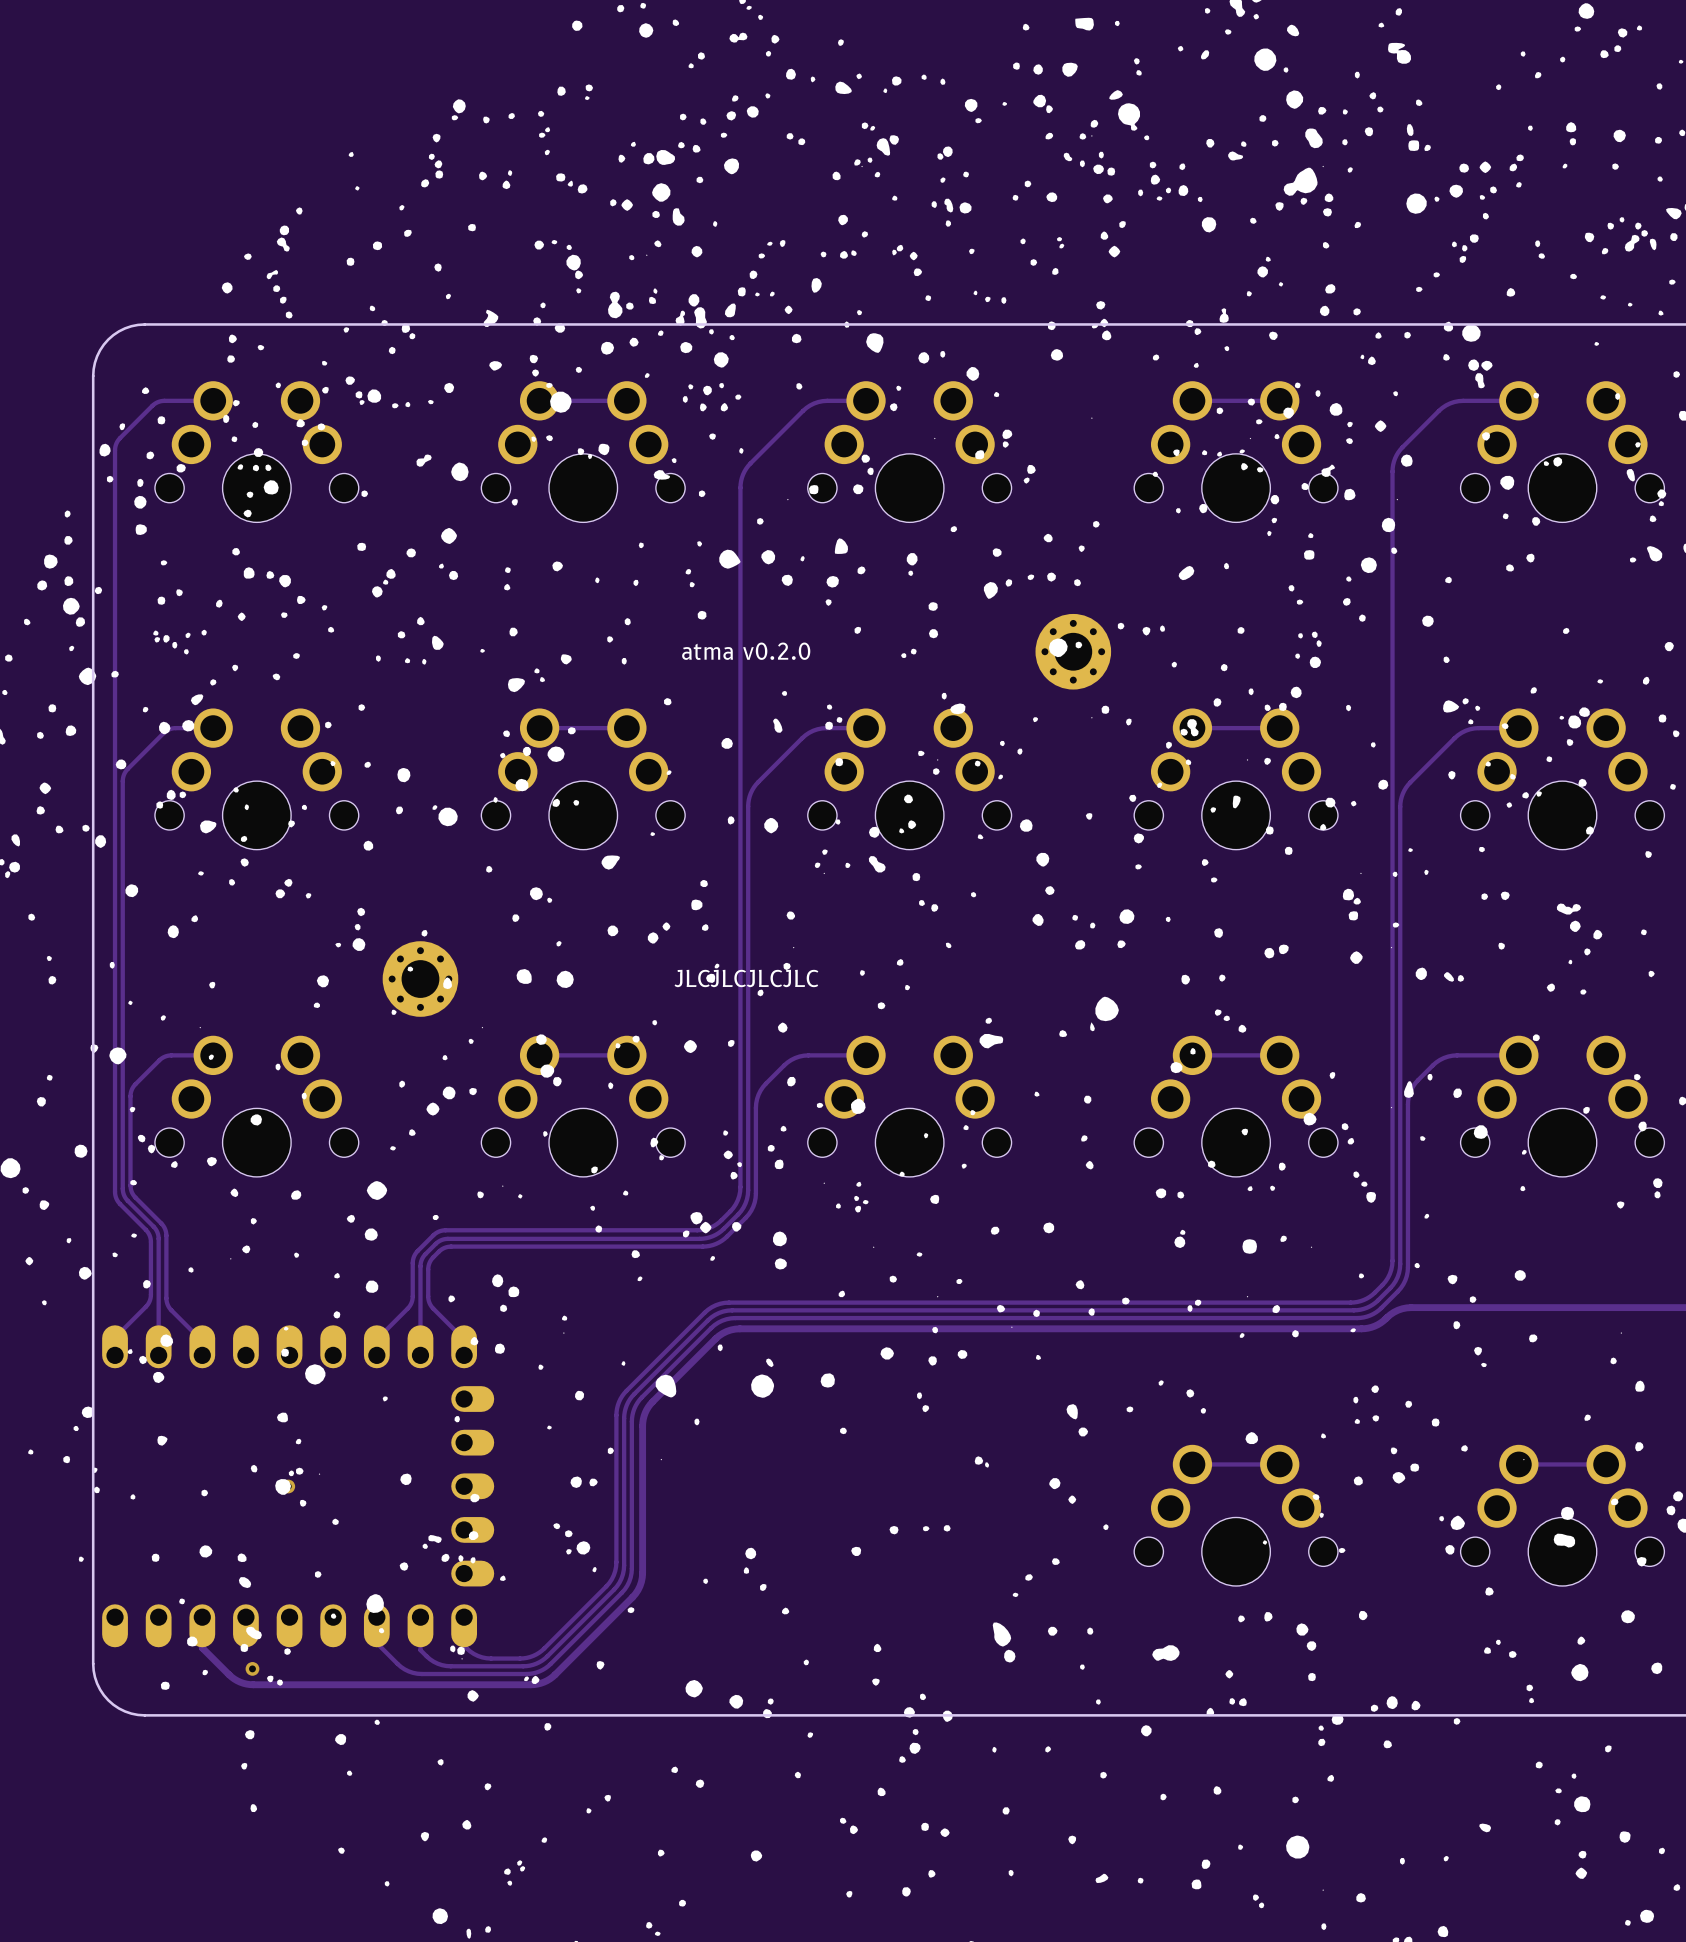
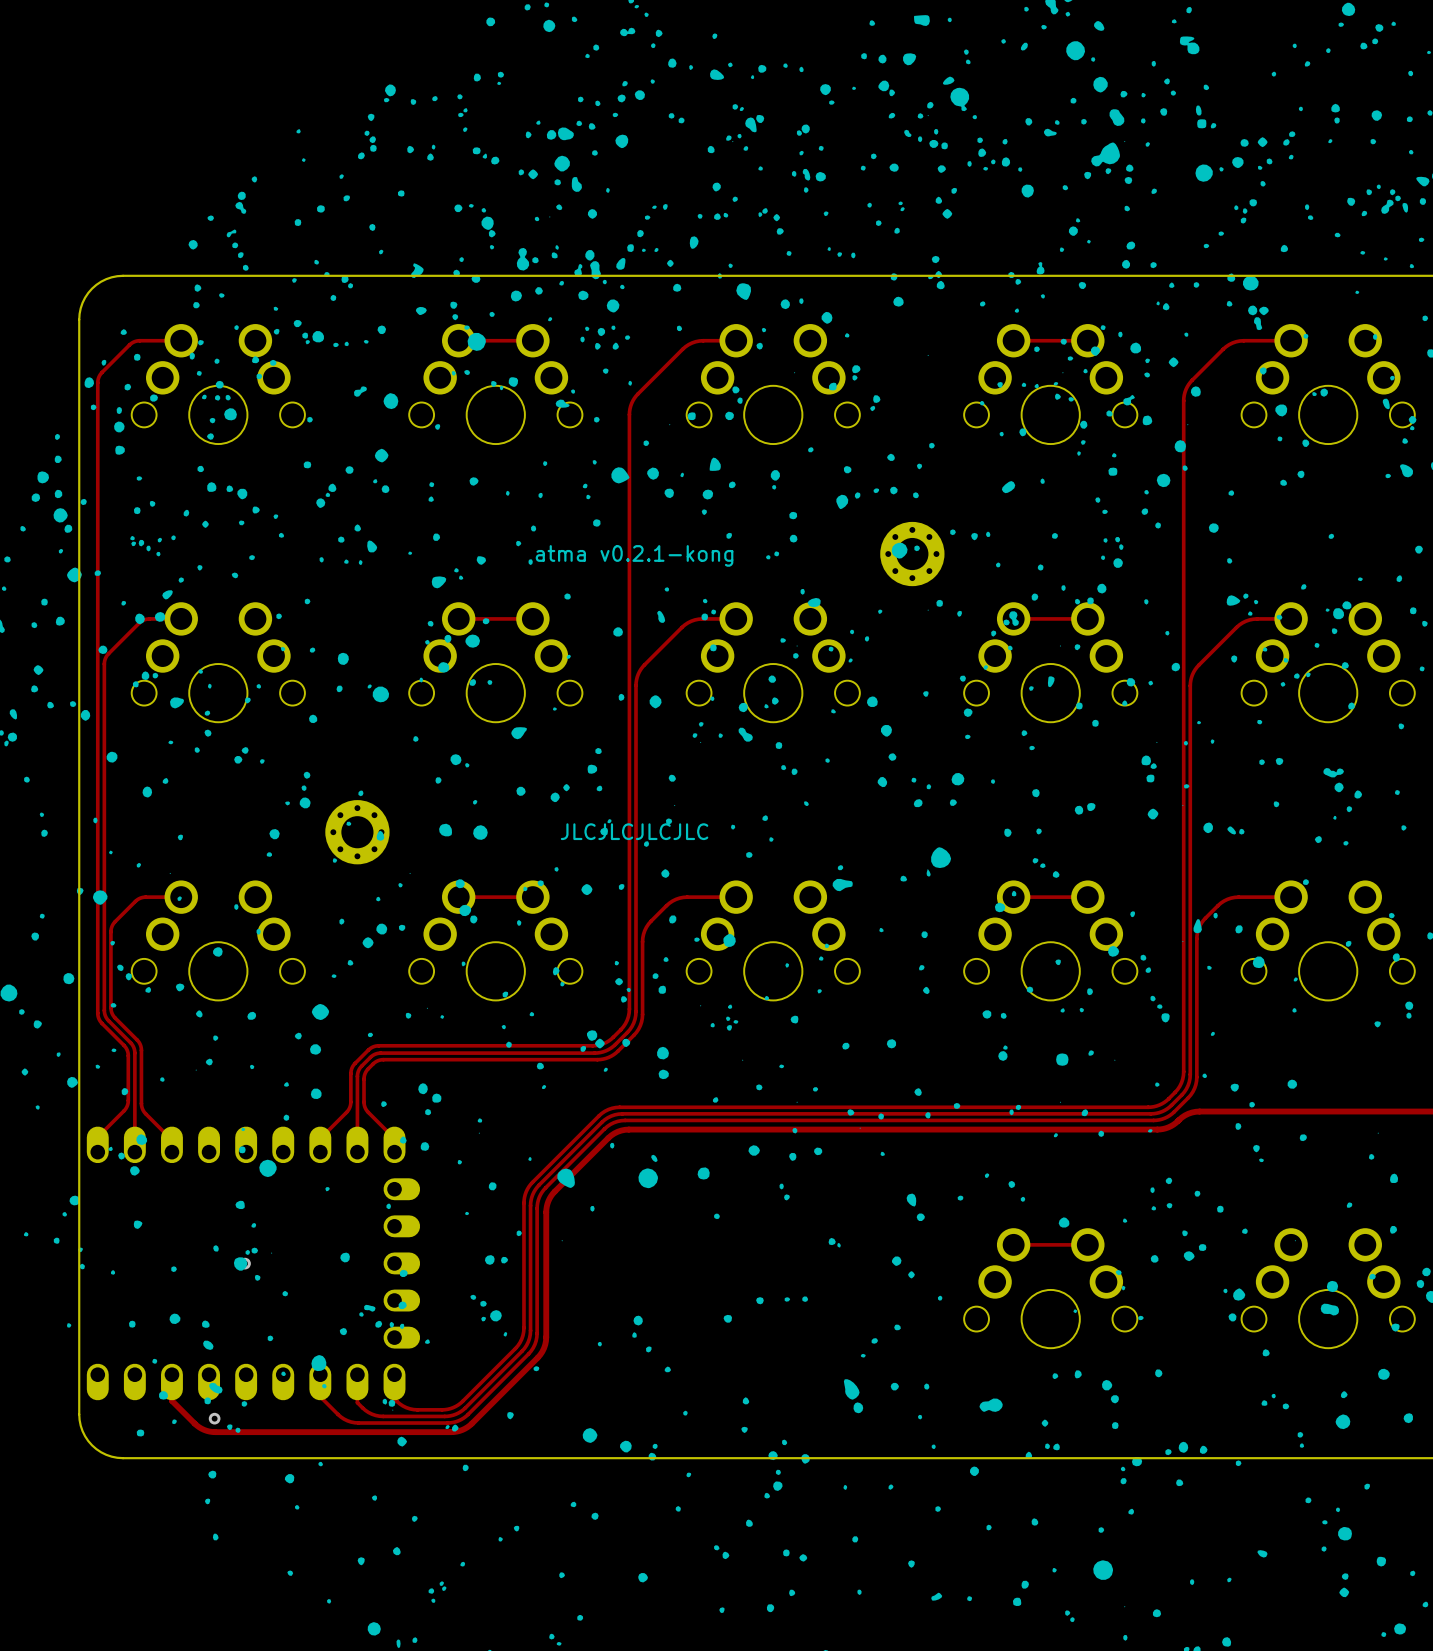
text: atma v0.2.0 (746, 651) -> atma v0.2.1-kong (634, 555)
track: (1518, 1464) (1606, 1464) -> none

